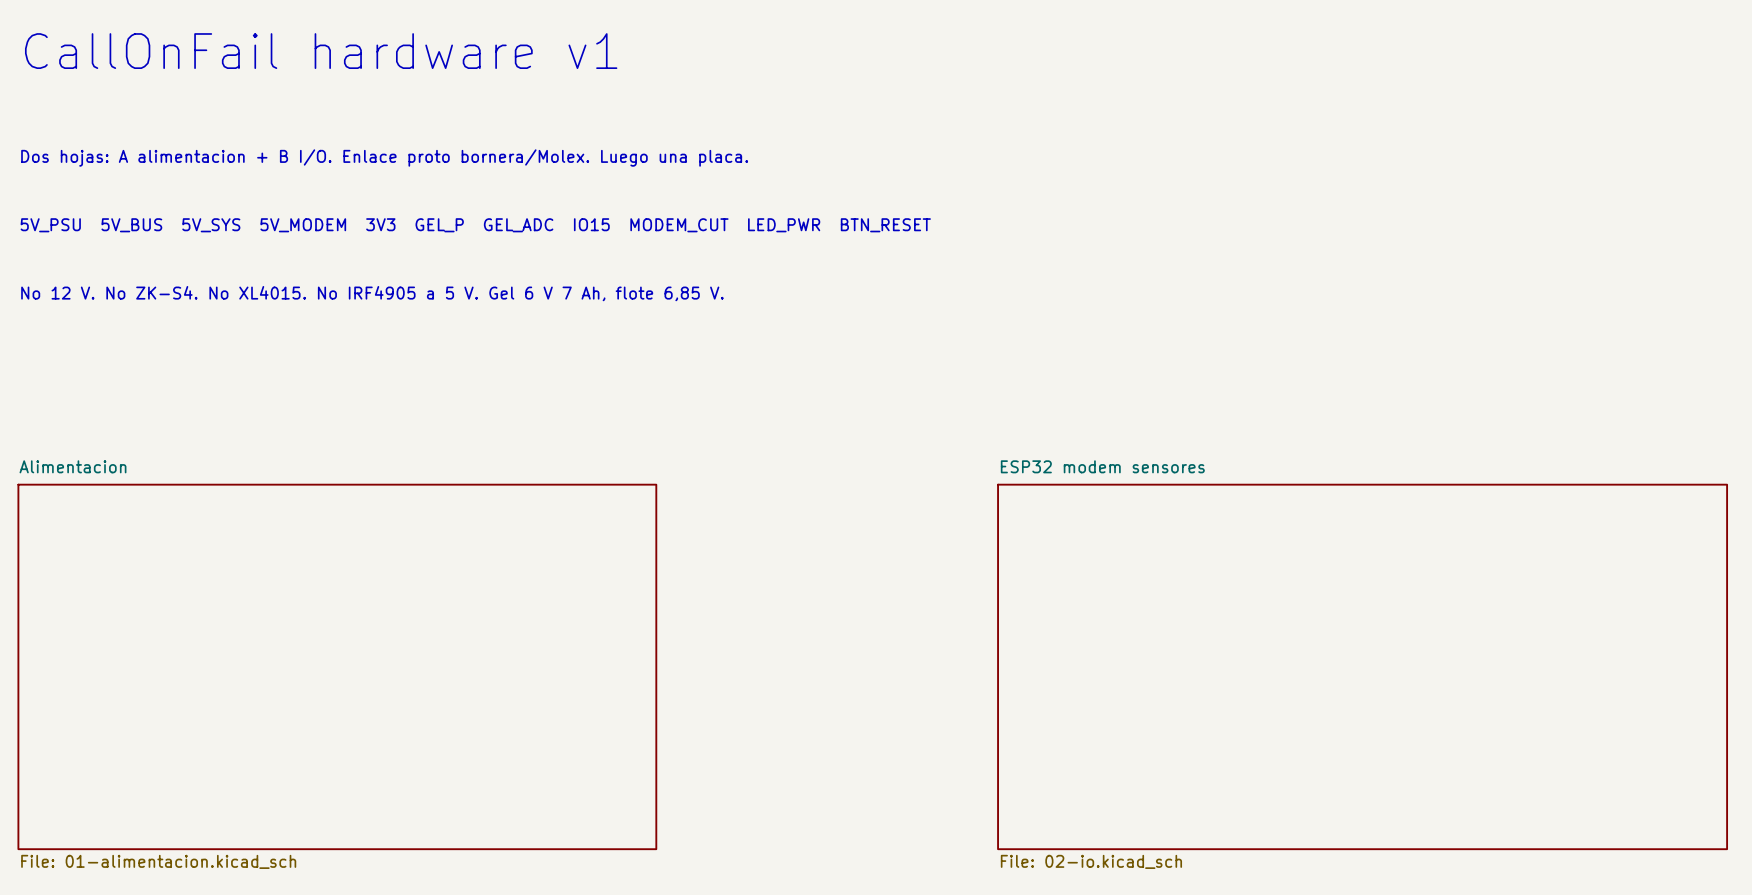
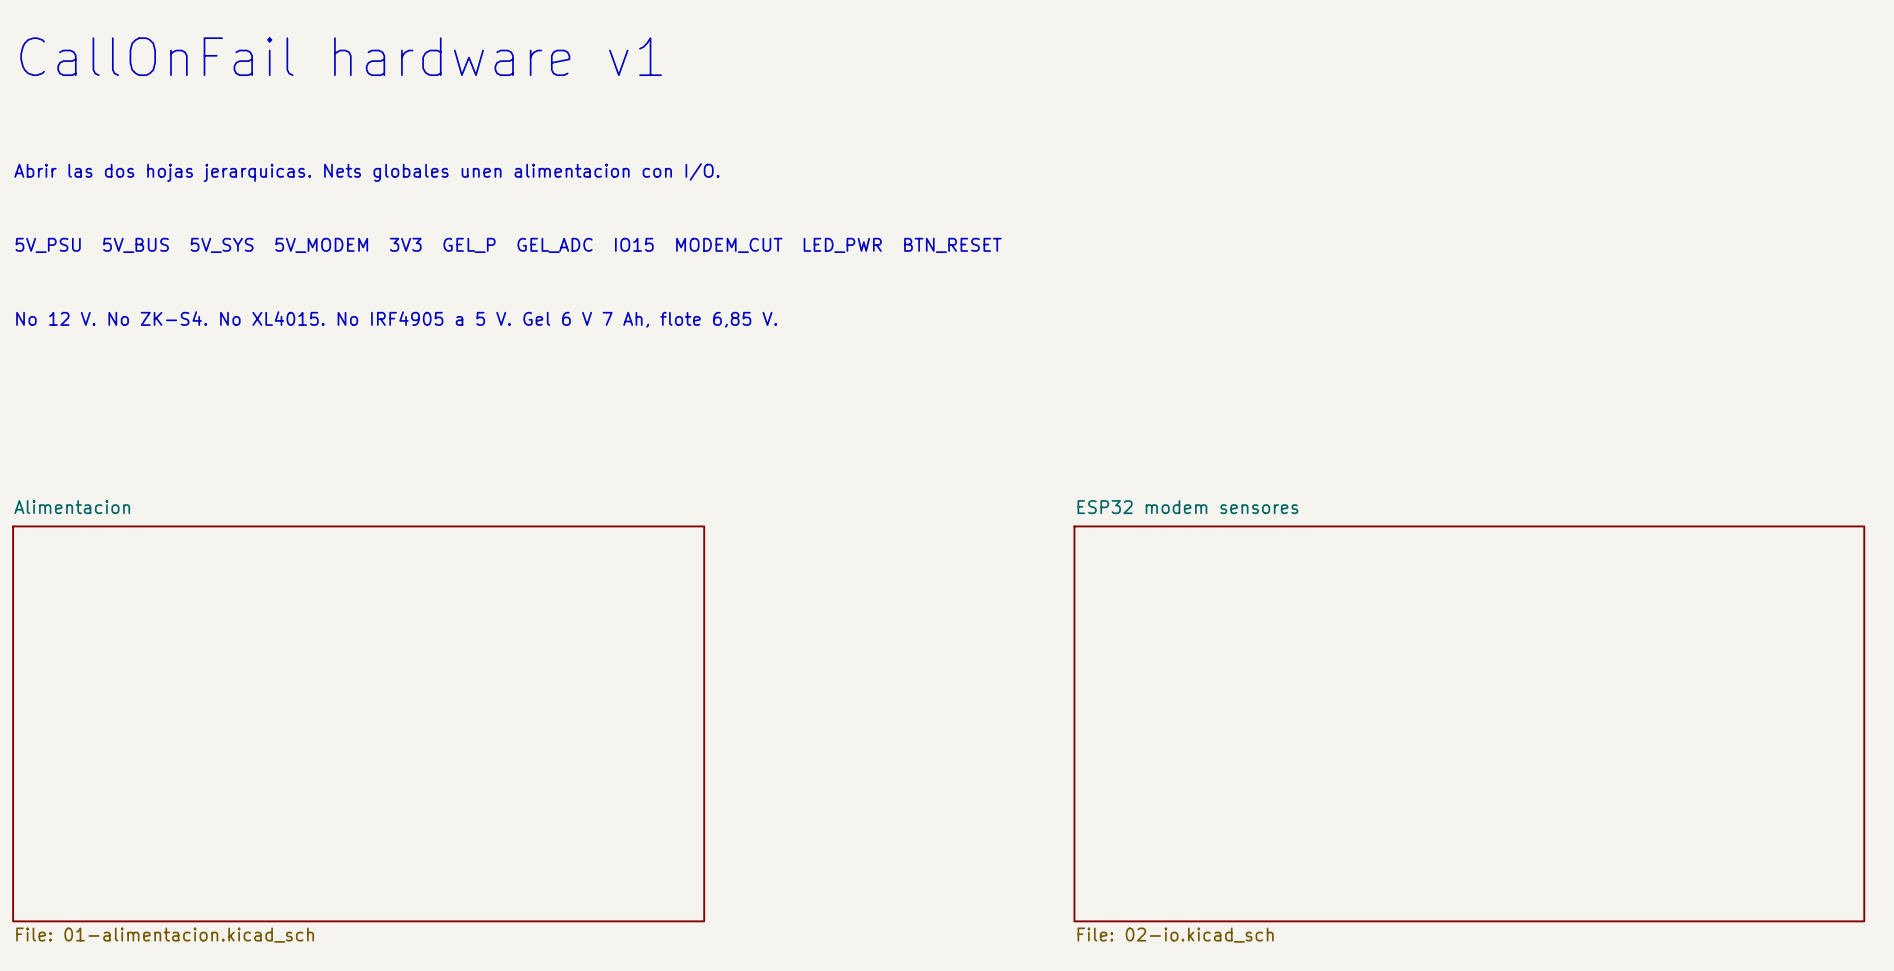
text: Dos hojas: A alimentacion + B I/O. Enlace proto bornera/Molex. Luego una placa. (384, 158) -> Abrir las dos hojas jerarquicas. Nets globales unen alimentacion con I/O. (366, 172)

